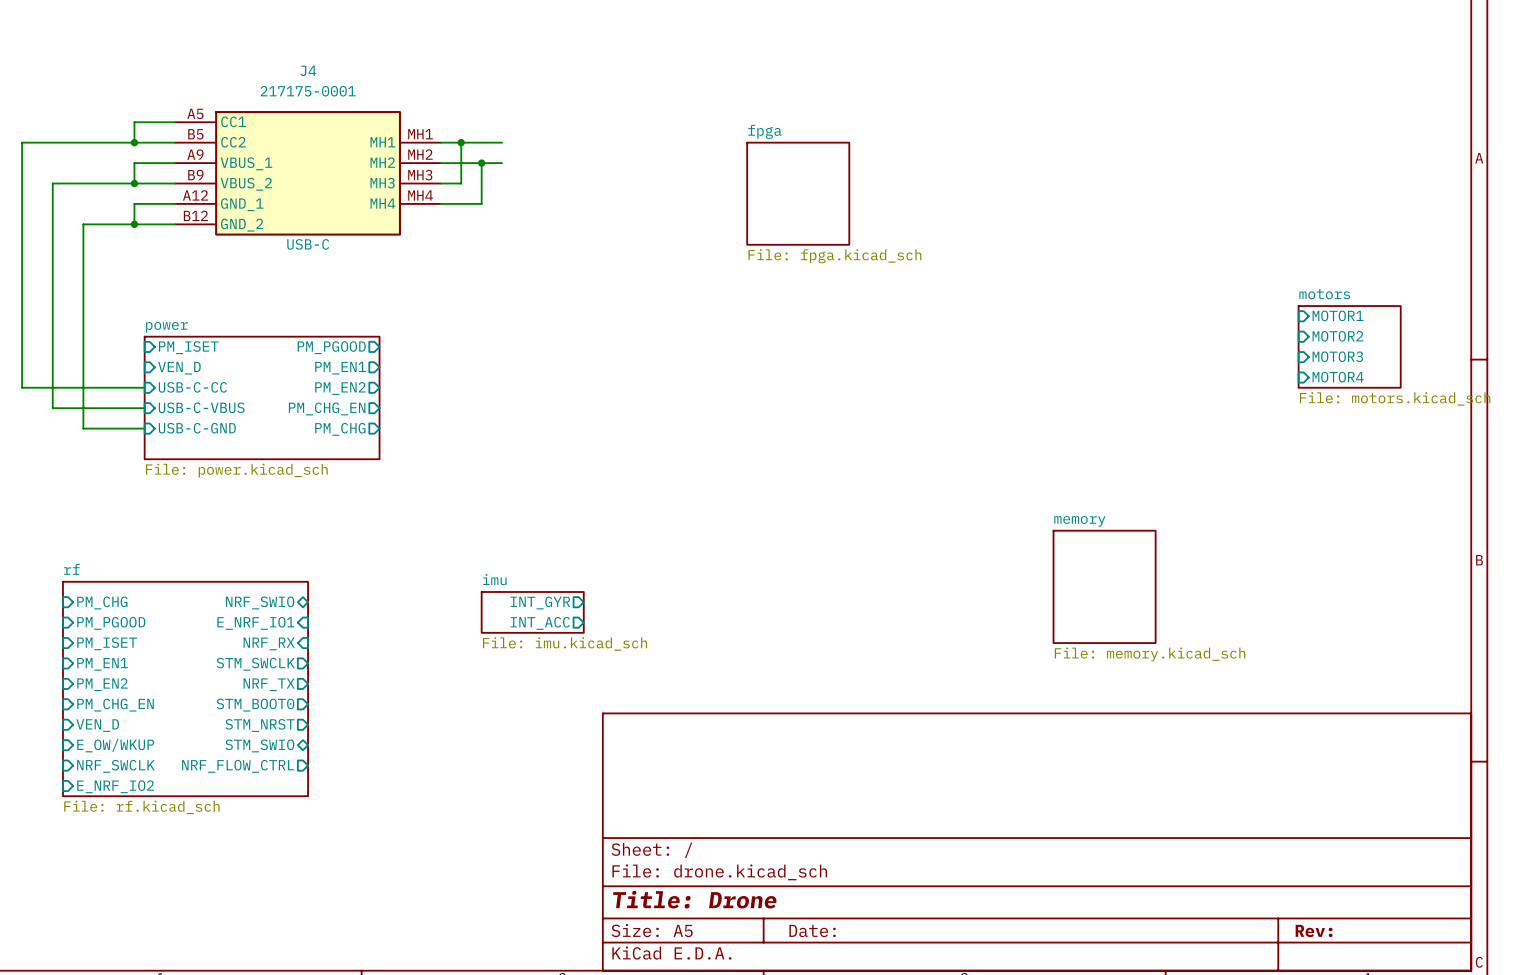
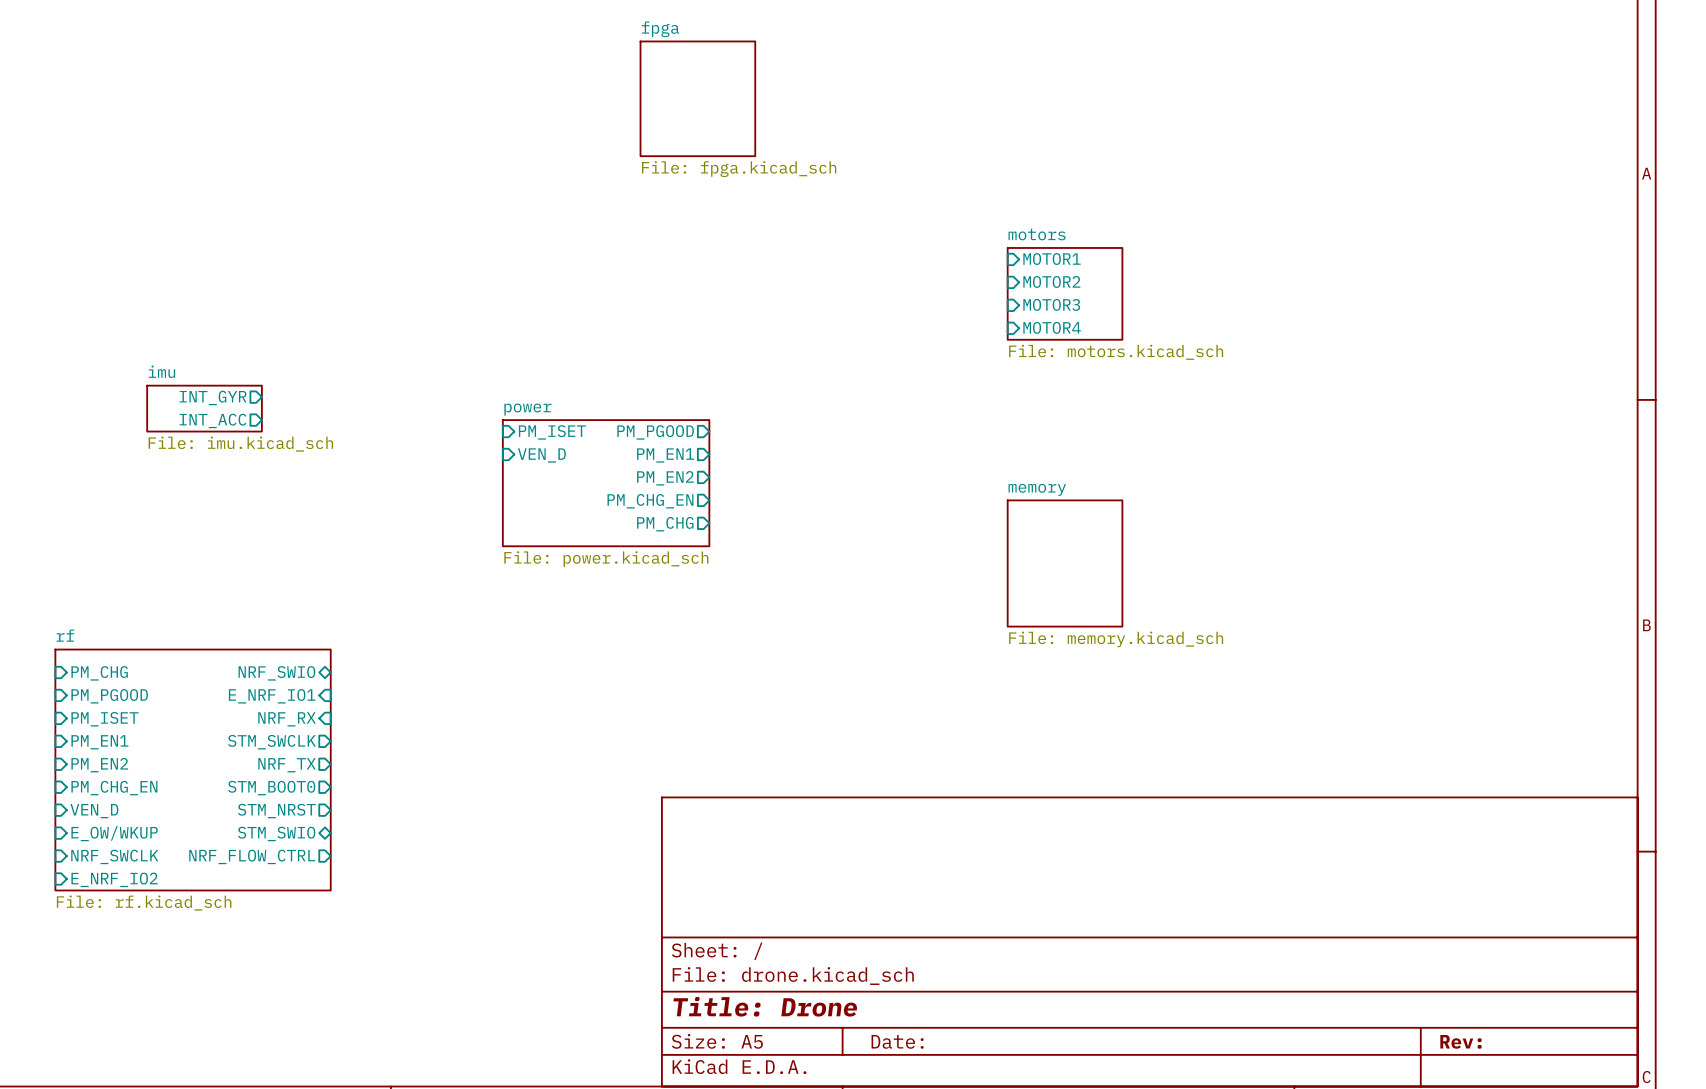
wire: (175, 122) (134, 122) (134, 142) -> none
junction: (134, 142) -> none
wire: (175, 142) (22, 142) (22, 387) (144, 387) -> none
wire: (440, 142) (502, 142) -> none
wire: (461, 142) (461, 183) (440, 183) -> none
junction: (461, 142) -> none
wire: (175, 163) (134, 163) (134, 183) -> none
wire: (440, 163) (502, 163) -> none
wire: (481, 163) (481, 203) (440, 203) -> none
junction: (481, 163) -> none
J4: 217175-0001 (308, 173) -> none
junction: (134, 183) -> none
wire: (175, 183) (52, 183) (52, 408) (144, 408) -> none
sheet fpga position: (798, 193) -> (697, 98)
wire: (175, 203) (134, 203) (134, 224) -> none
junction: (134, 224) -> none
wire: (175, 224) (83, 224) (83, 428) (144, 428) -> none
sheet pin: none -> MOTOR1 (1051, 259)
sheet pin: none -> MOTOR2 (1051, 281)
sheet motors: none -> File: motors.kicad_sch (1065, 293)
sheet pin: none -> MOTOR3 (1051, 304)
sheet pin: none -> MOTOR4 (1052, 327)
sheet pin: MOTOR1 (1338, 315) -> none
sheet pin: MOTOR2 (1337, 336) -> none
sheet motors: File: motors.kicad_sch (1349, 346) -> none
sheet pin: PM_ISET (188, 347) -> none
sheet pin: PM_PGOOD (331, 347) -> none
sheet pin: MOTOR3 (1337, 356) -> none
sheet pin: none -> INT_GYR (213, 397)
sheet imu: none -> File: imu.kicad_sch (204, 408)
sheet pin: VEN_D (179, 368) -> none
sheet pin: PM_EN1 (340, 368) -> none
sheet pin: MOTOR4 (1338, 377) -> none
sheet pin: none -> INT_ACC (212, 420)
sheet pin: USB-C-CC (192, 387) -> none
sheet pin: PM_EN2 (340, 388) -> none
sheet pin: none -> PM_ISET (552, 432)
sheet pin: none -> PM_PGOOD (655, 432)
sheet power: File: power.kicad_sch (262, 397) -> none
sheet pin: USB-C-VBUS (201, 407) -> none
sheet pin: PM_CHG_EN (327, 408) -> none
sheet pin: none -> VEN_D (541, 455)
sheet pin: none -> PM_EN1 (665, 455)
sheet pin: USB-C-GND (197, 428) -> none
sheet pin: PM_CHG (340, 429) -> none
sheet pin: none -> PM_EN2 (665, 478)
sheet power: none -> File: power.kicad_sch (606, 483)
sheet pin: none -> PM_CHG_EN (650, 501)
sheet pin: none -> PM_CHG (665, 524)
sheet memory position: (1104, 586) -> (1065, 563)
sheet pin: INT_GYR (540, 602) -> none
sheet imu: File: imu.kicad_sch (532, 612) -> none
sheet pin: INT_ACC (540, 623) -> none

